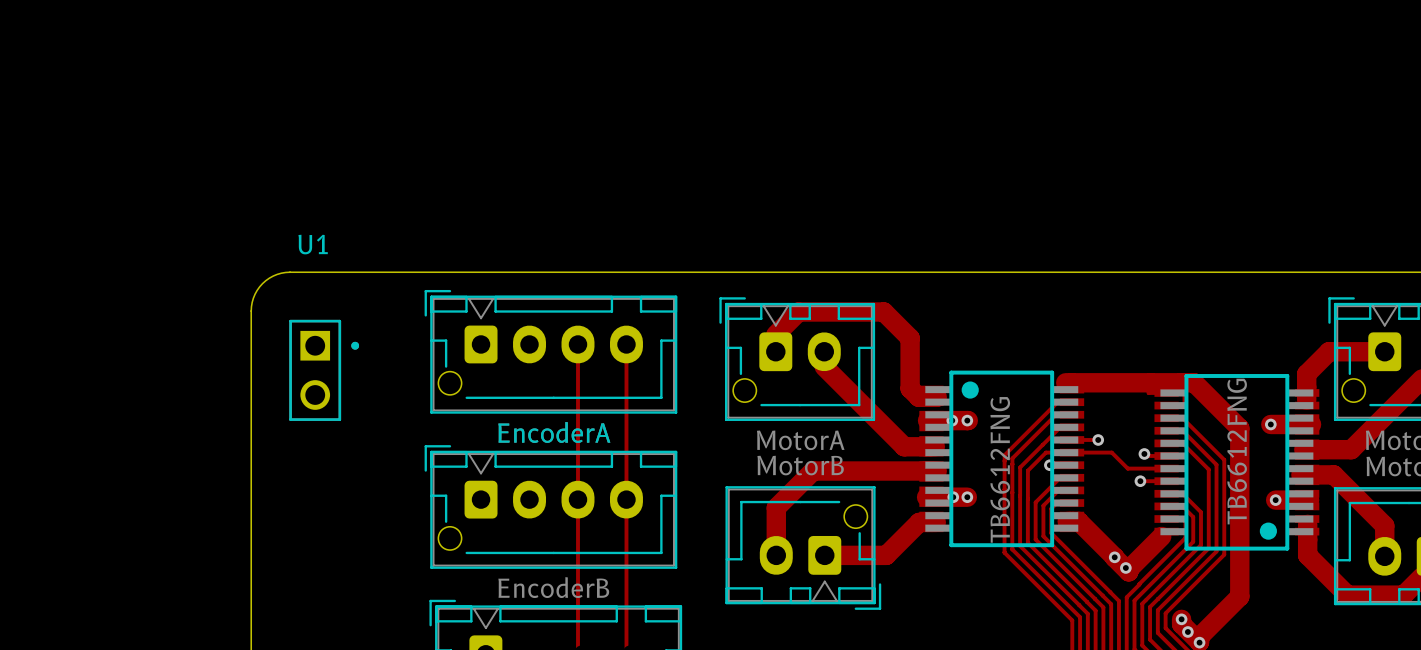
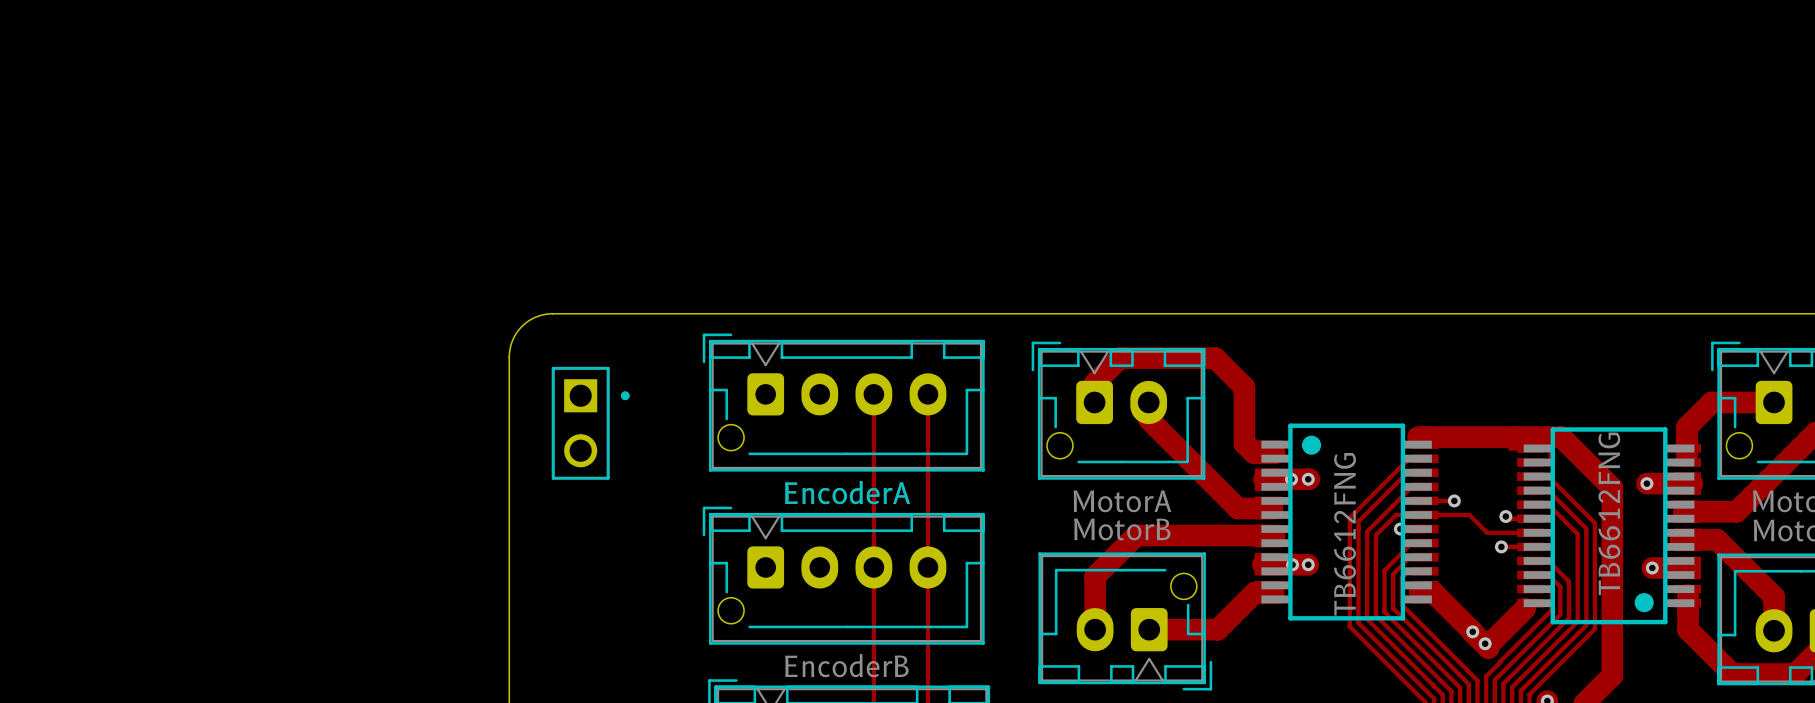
U1 name: U1 (313, 244) -> none

